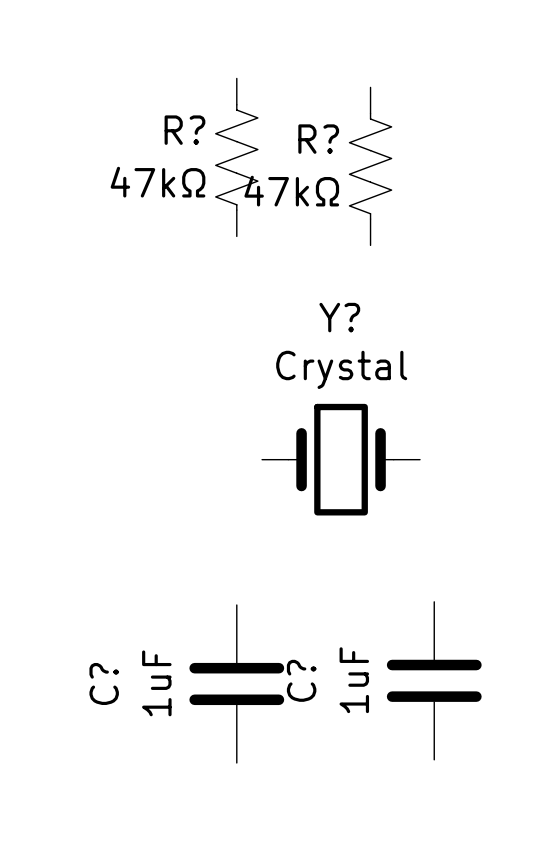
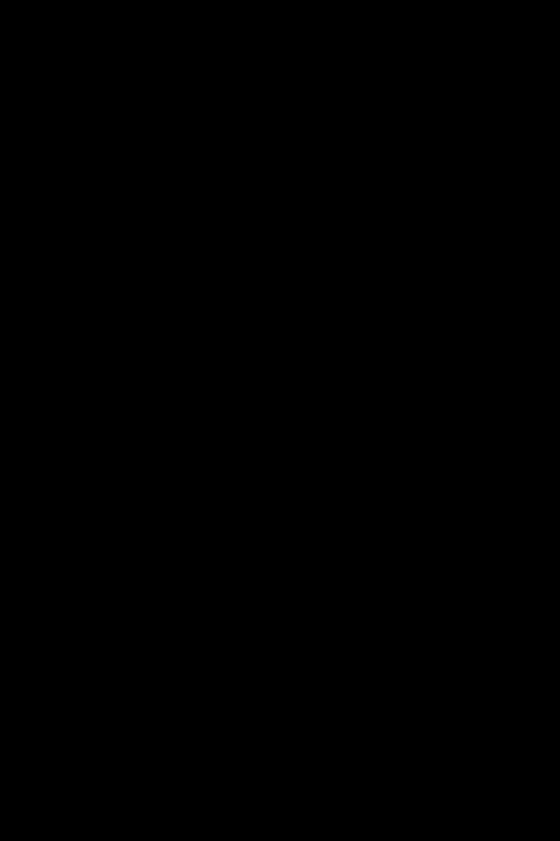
R?: 47kΩ (236, 157) -> none
R?: 47kΩ (370, 166) -> none
Y?: Crystal (341, 459) -> none
C?: 1uF (434, 680) -> none
C?: 1uF (236, 683) -> none

